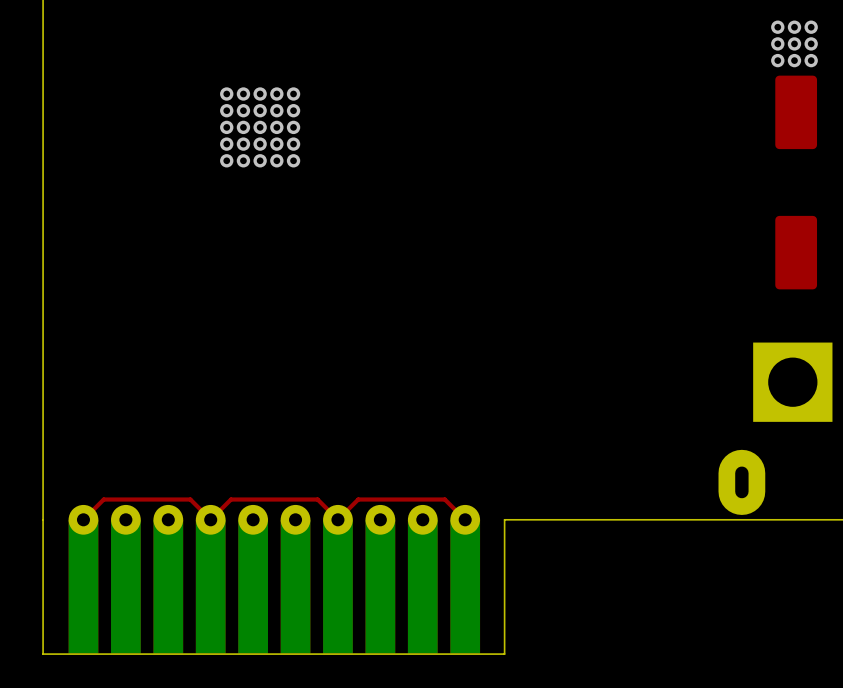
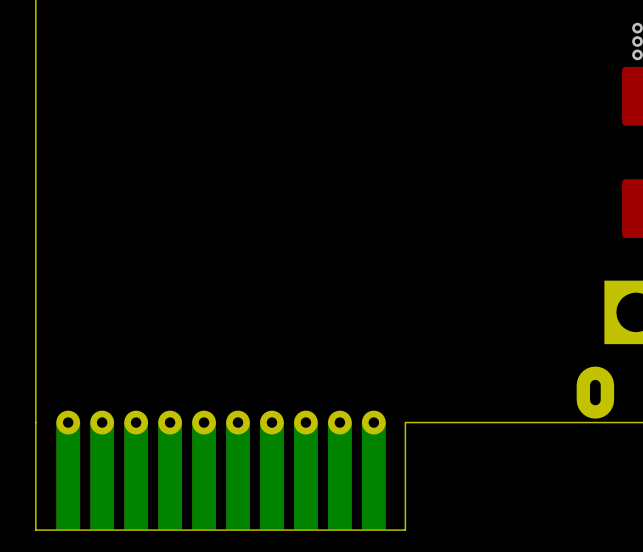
via: (777, 27) -> none
via: (777, 43) -> none
via: (777, 60) -> none
via: (226, 94) -> none
via: (243, 94) -> none
via: (260, 94) -> none
via: (276, 94) -> none
via: (293, 94) -> none
via: (226, 110) -> none
via: (243, 110) -> none
via: (260, 110) -> none
via: (276, 110) -> none
via: (293, 110) -> none
via: (226, 127) -> none
via: (243, 127) -> none
via: (260, 127) -> none
via: (276, 127) -> none
via: (293, 127) -> none
via: (226, 144) -> none
via: (243, 144) -> none
via: (260, 144) -> none
via: (276, 144) -> none
via: (293, 144) -> none
via: (226, 160) -> none
via: (243, 160) -> none
via: (260, 160) -> none
via: (276, 160) -> none
via: (293, 160) -> none
top track: (465, 519) (444, 499) (358, 499) (337, 519) (317, 499) (231, 499) (210, 519) (190, 499) (103, 499) (83, 519) -> none

